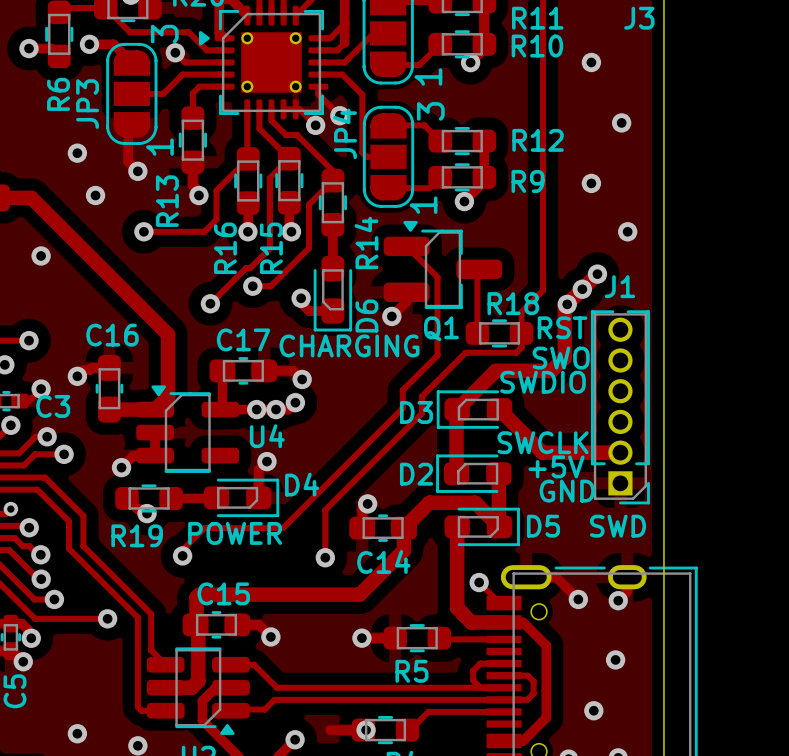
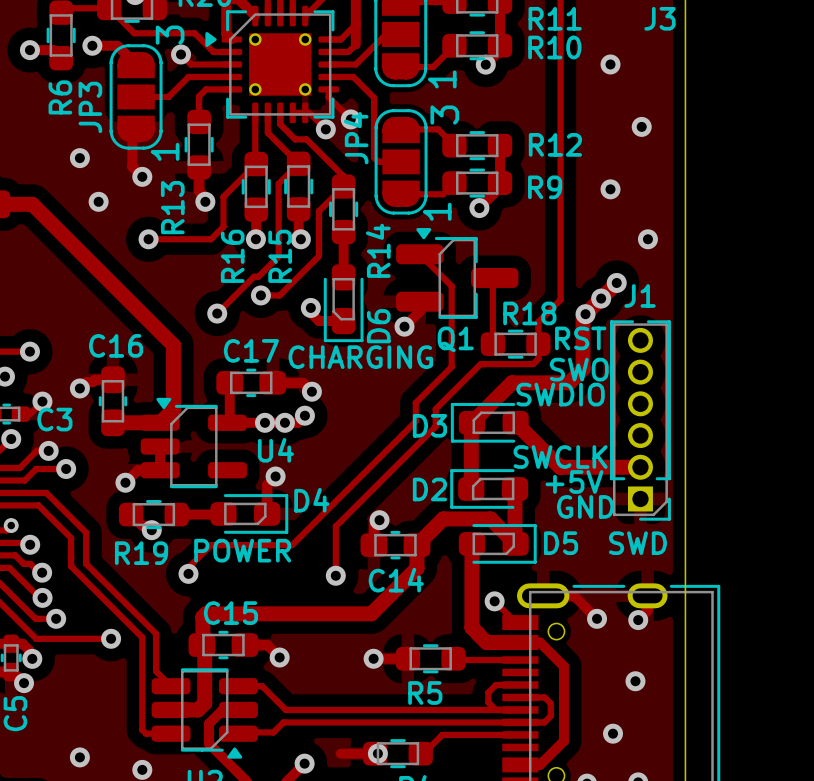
via: (41, 255) -> none

